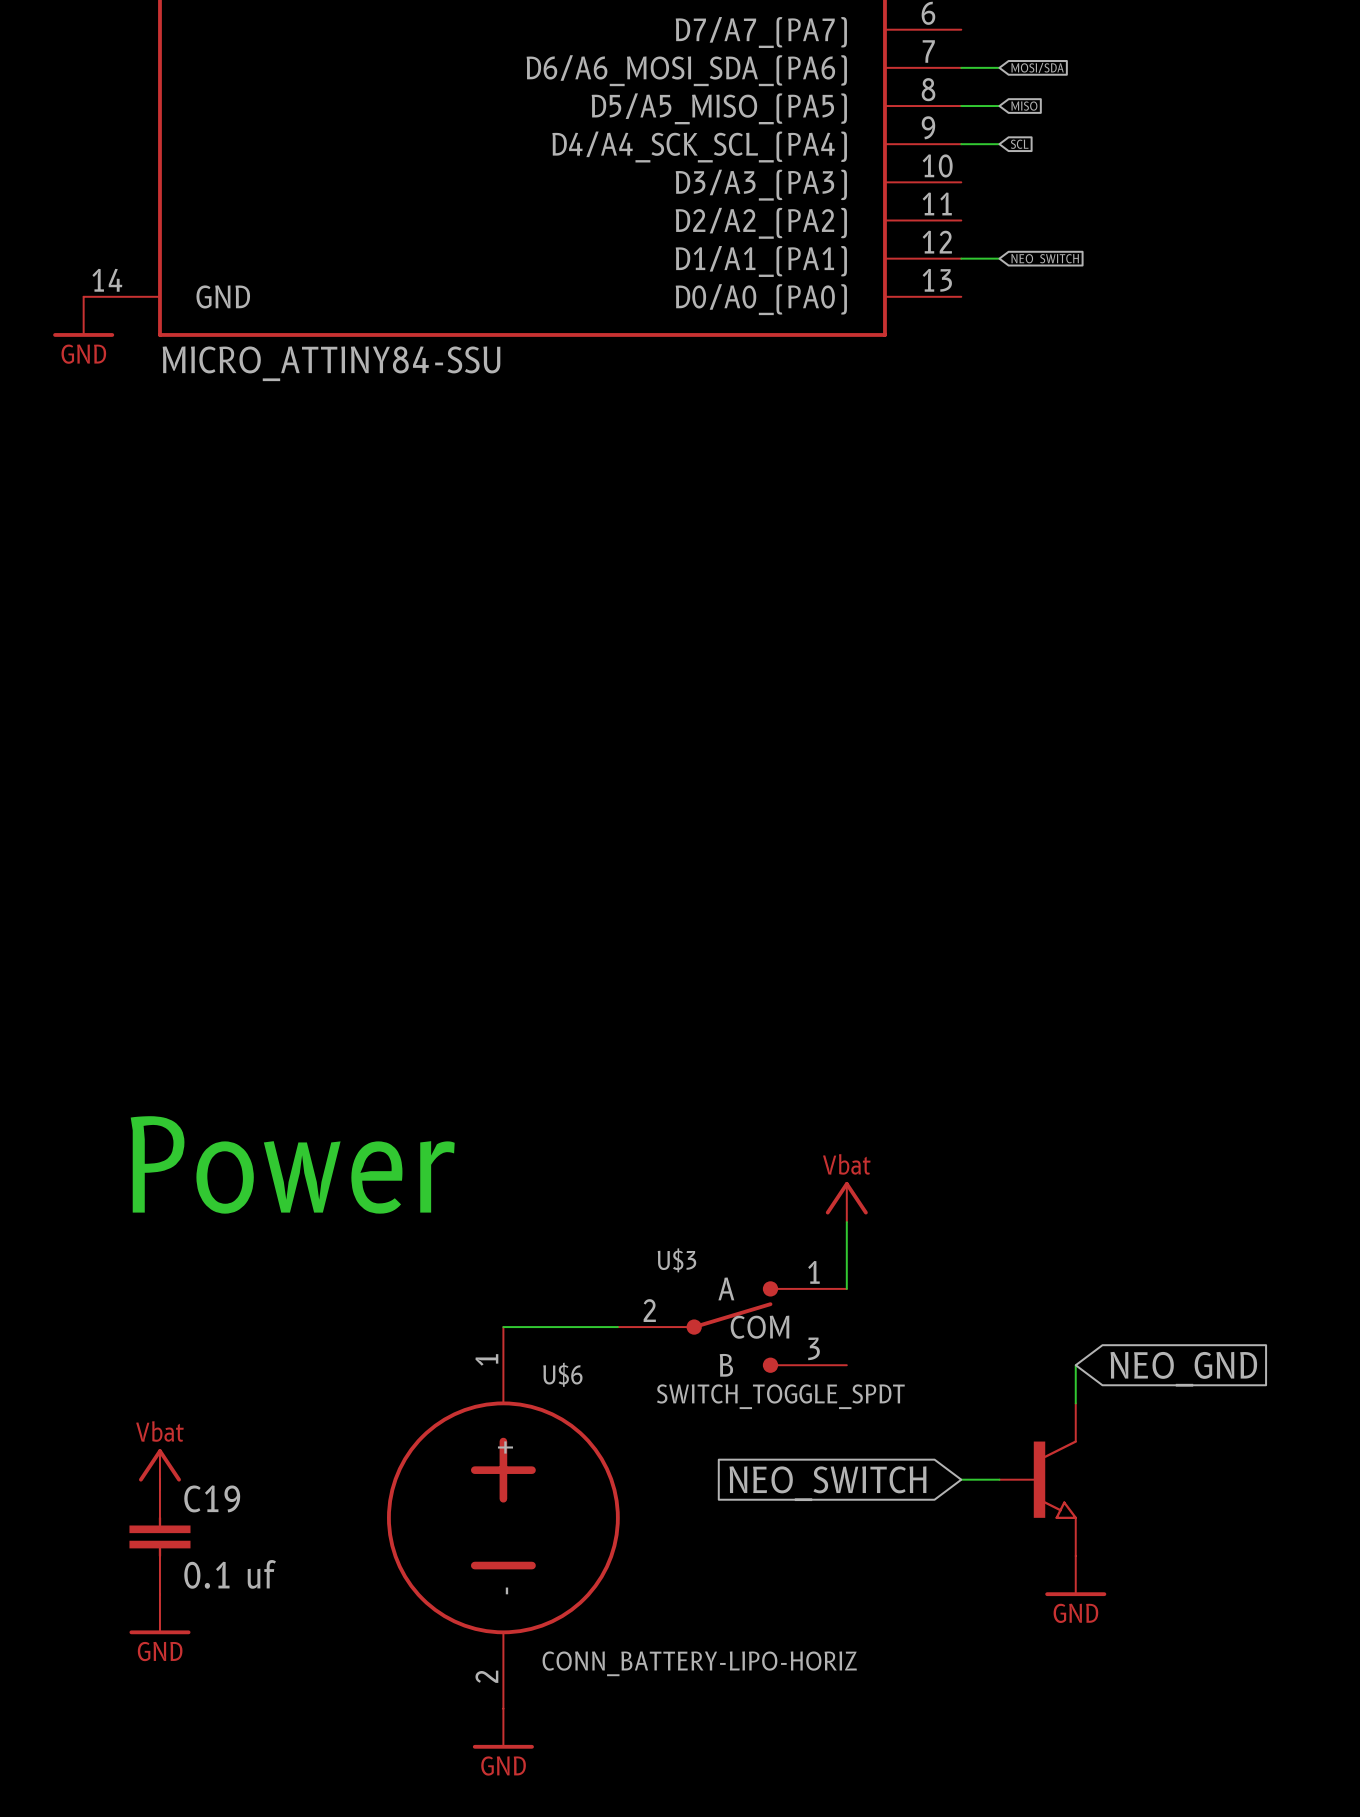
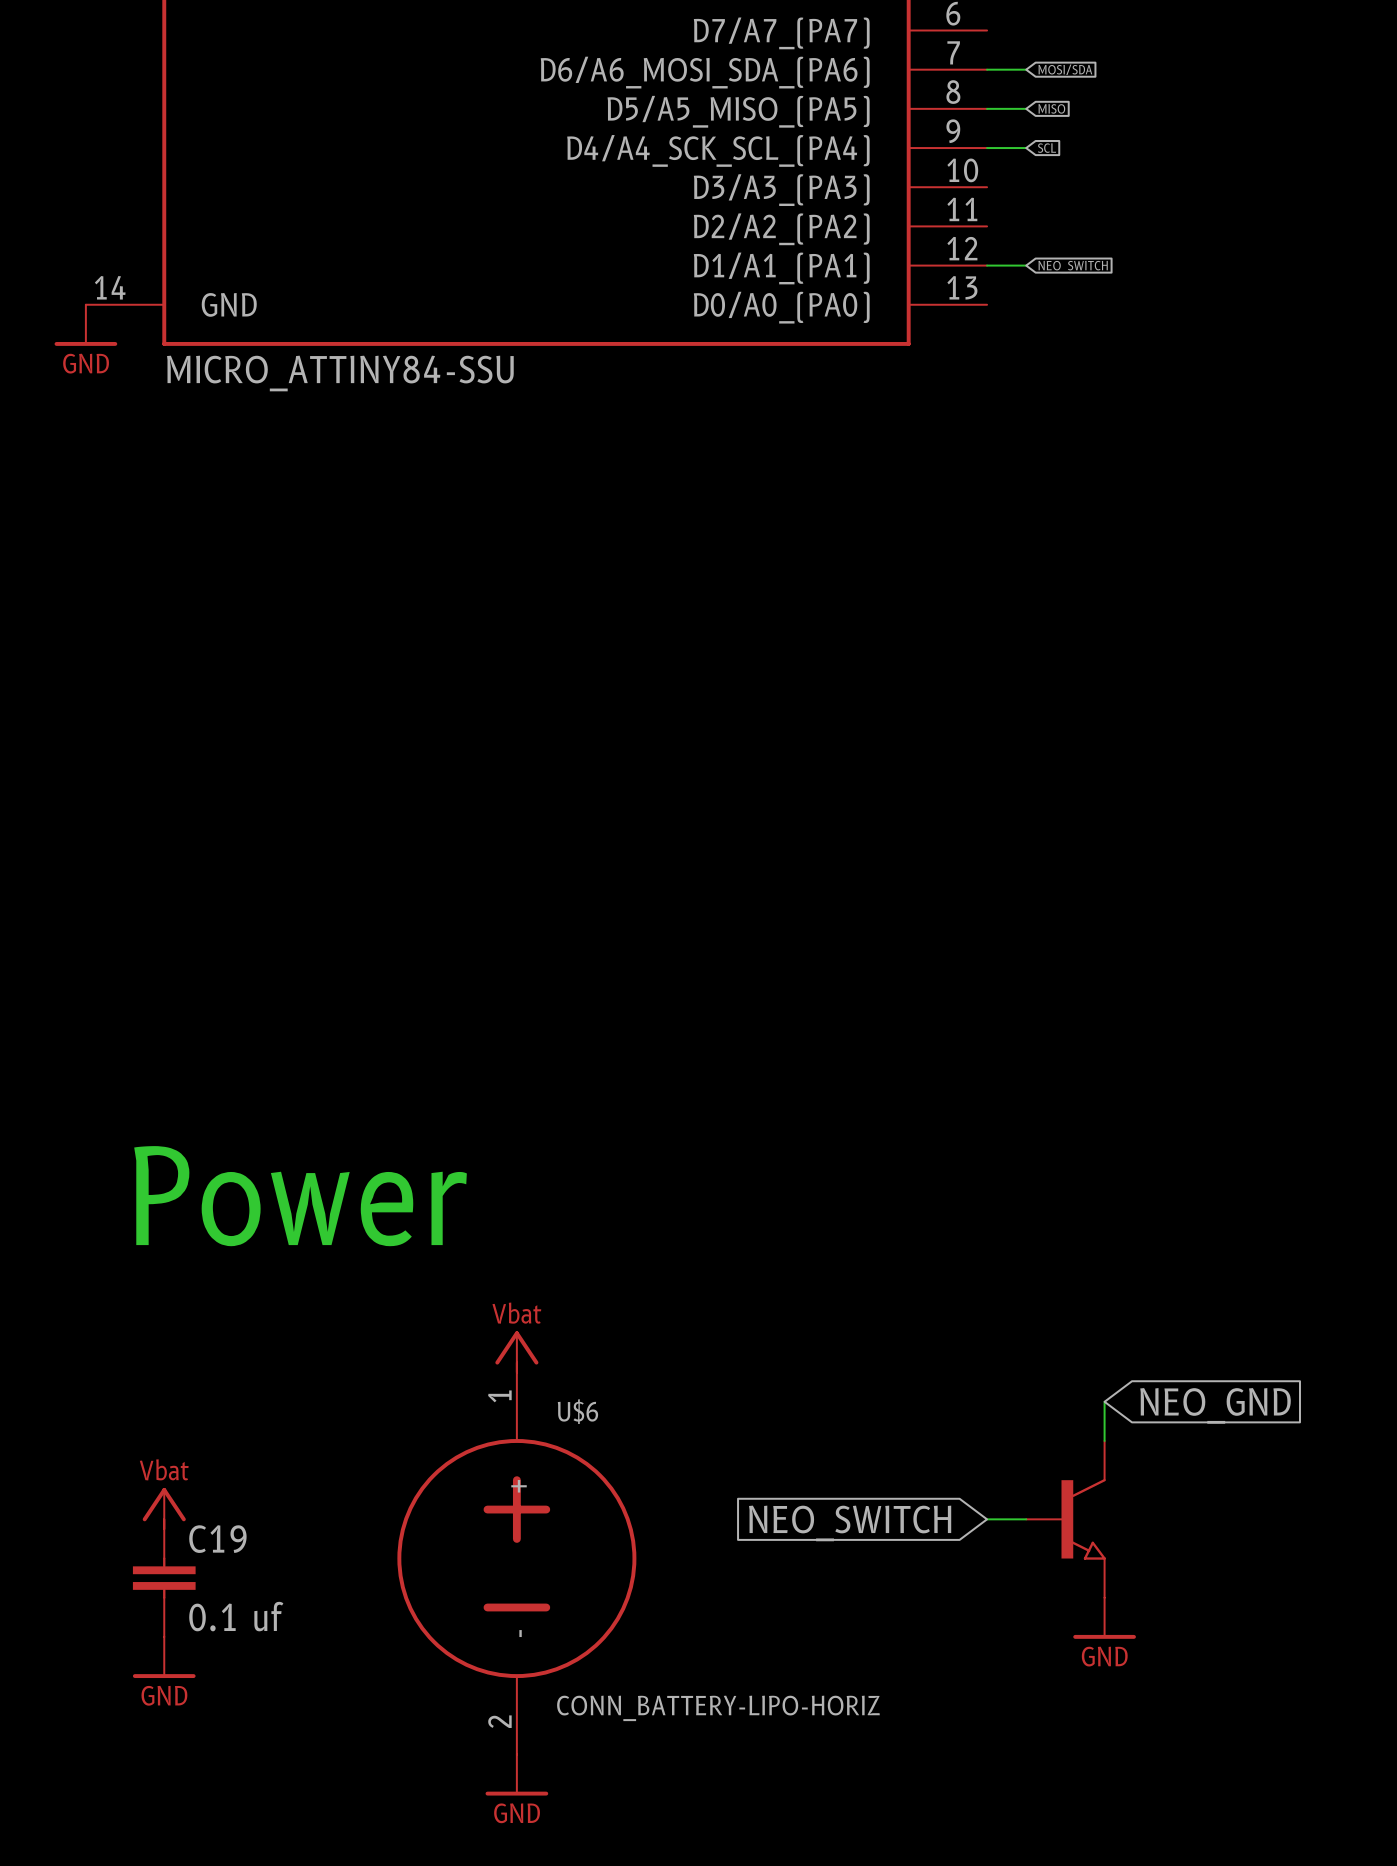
power symbol position: (846, 1202) -> (516, 1351)
wire: (846, 1222) (846, 1288) -> none
wire: (503, 1327) (617, 1327) -> none
U$3: SWITCH_TOGGLE_SPDT (732, 1327) -> none

